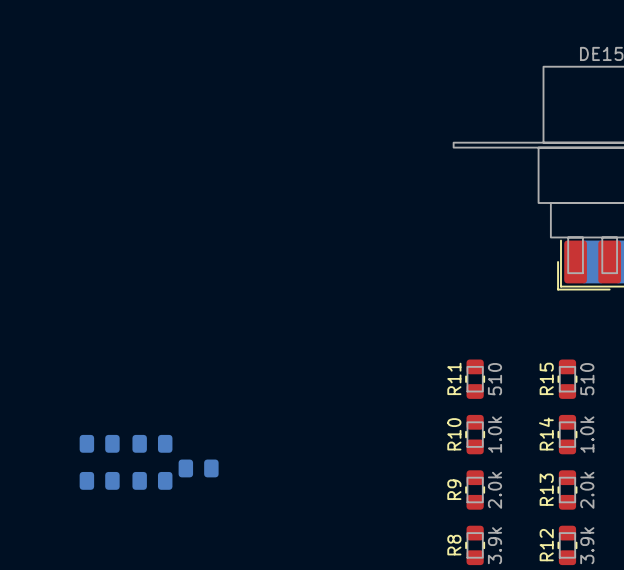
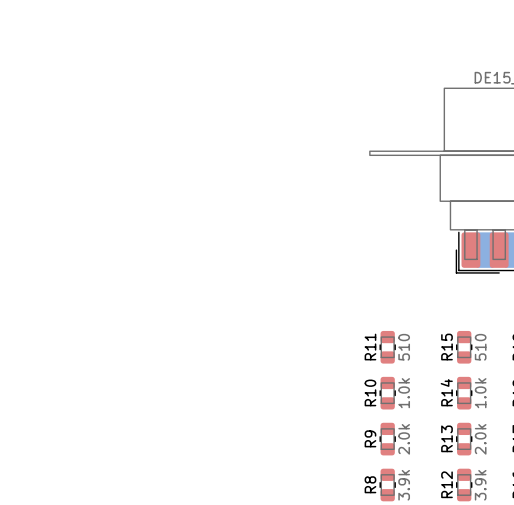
part: (99, 443) -> none
part: (152, 443) -> none
part: (198, 468) -> none
part: (99, 480) -> none
part: (152, 480) -> none

